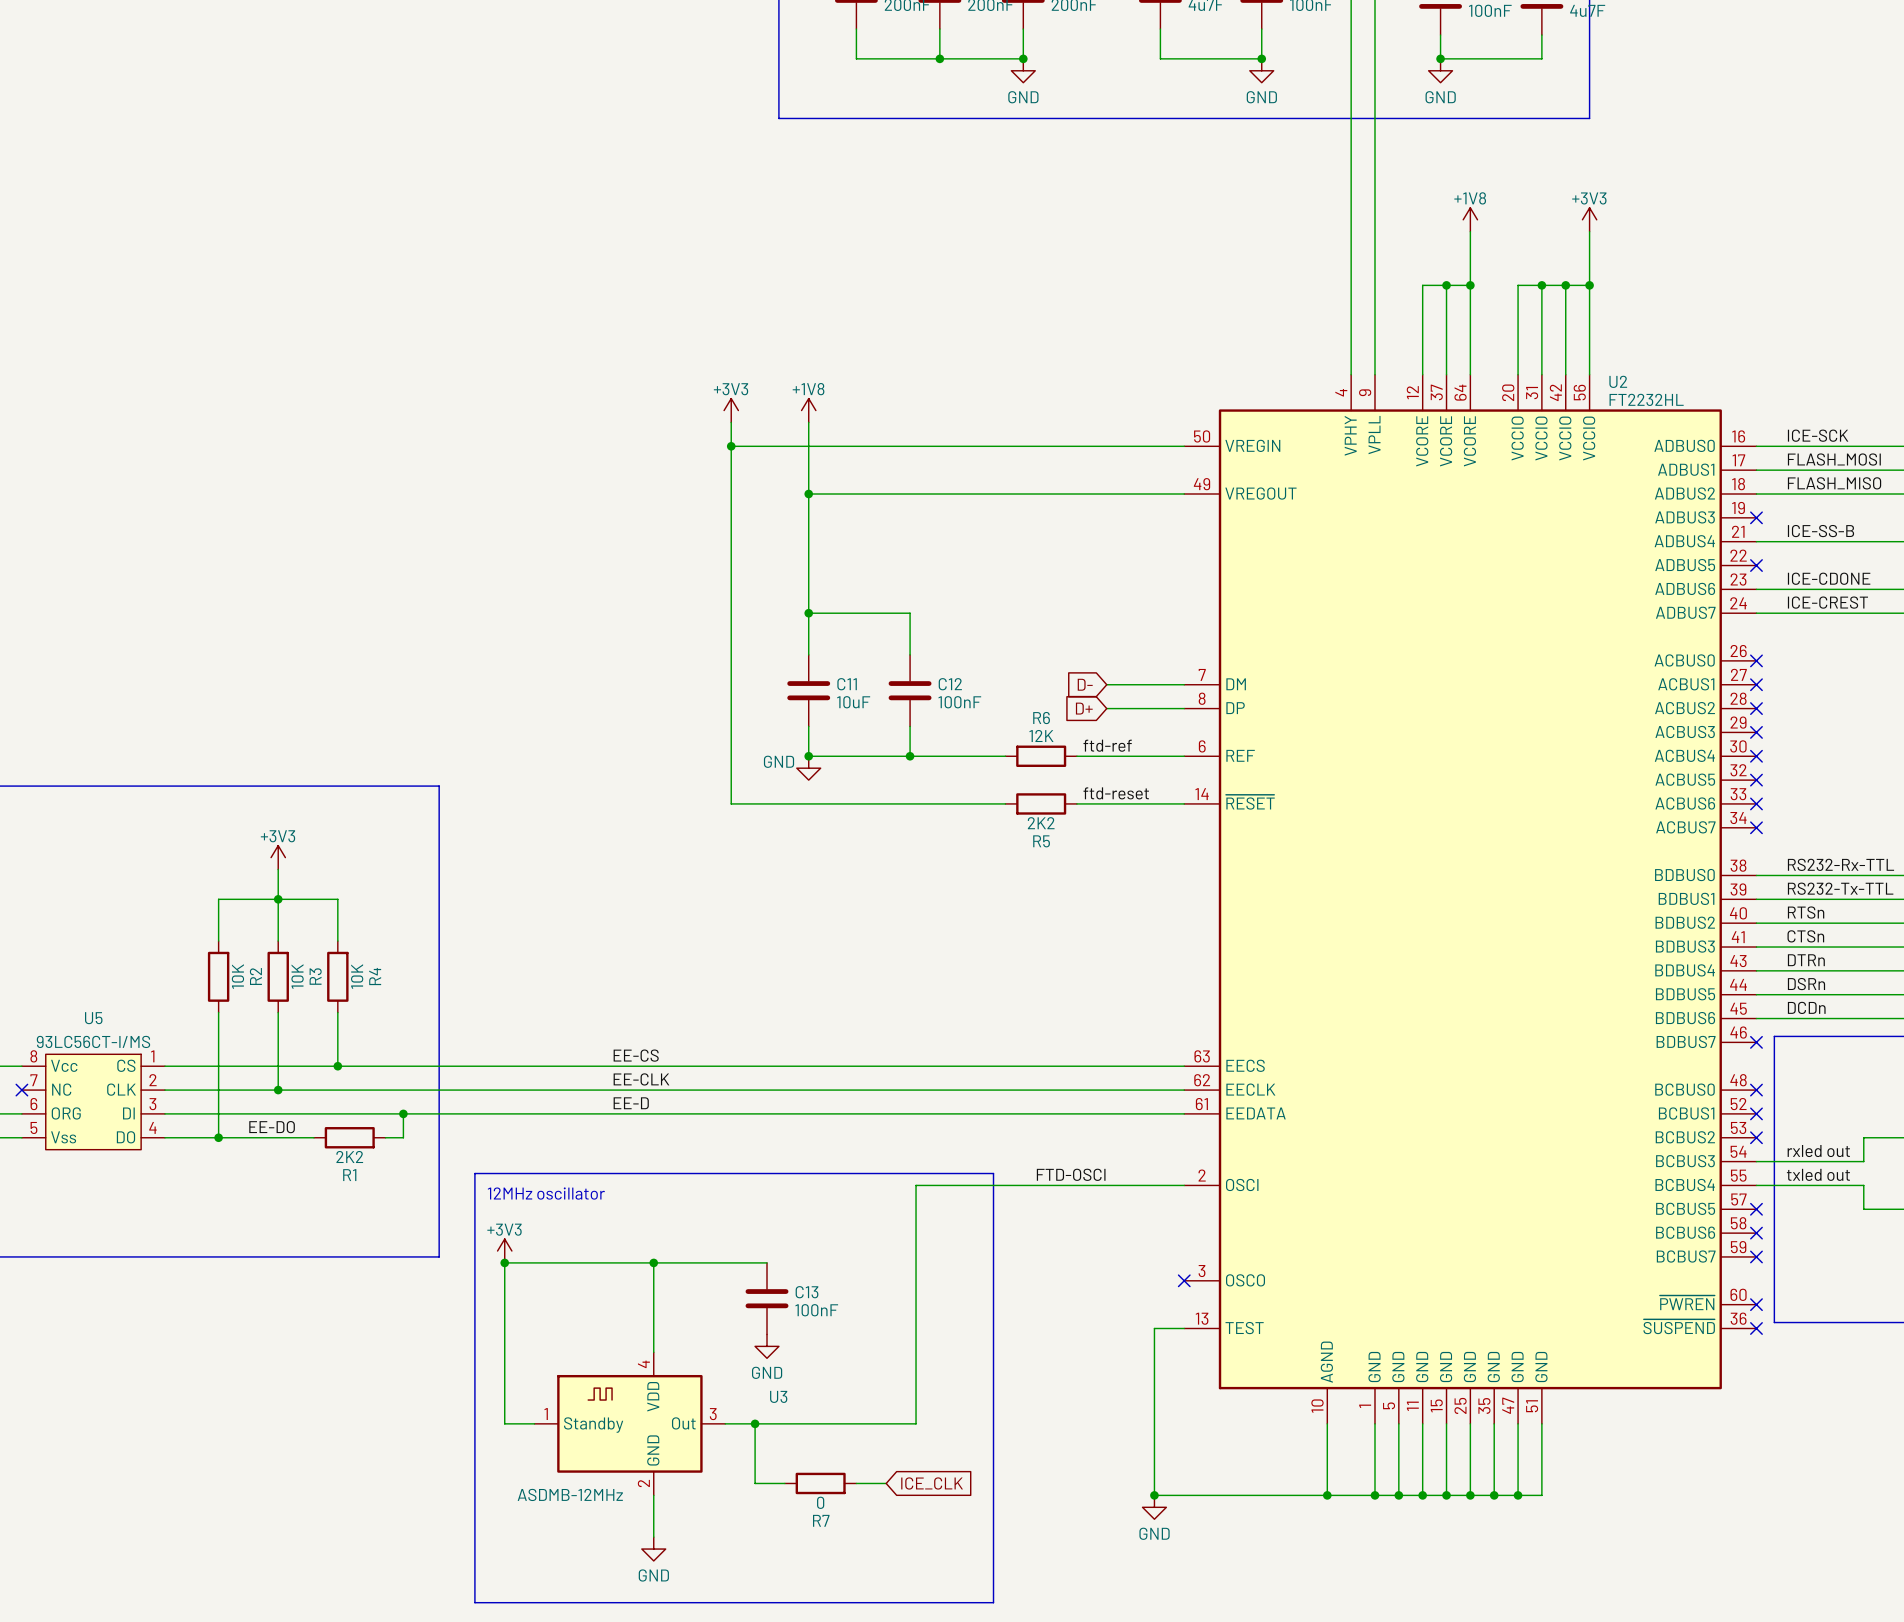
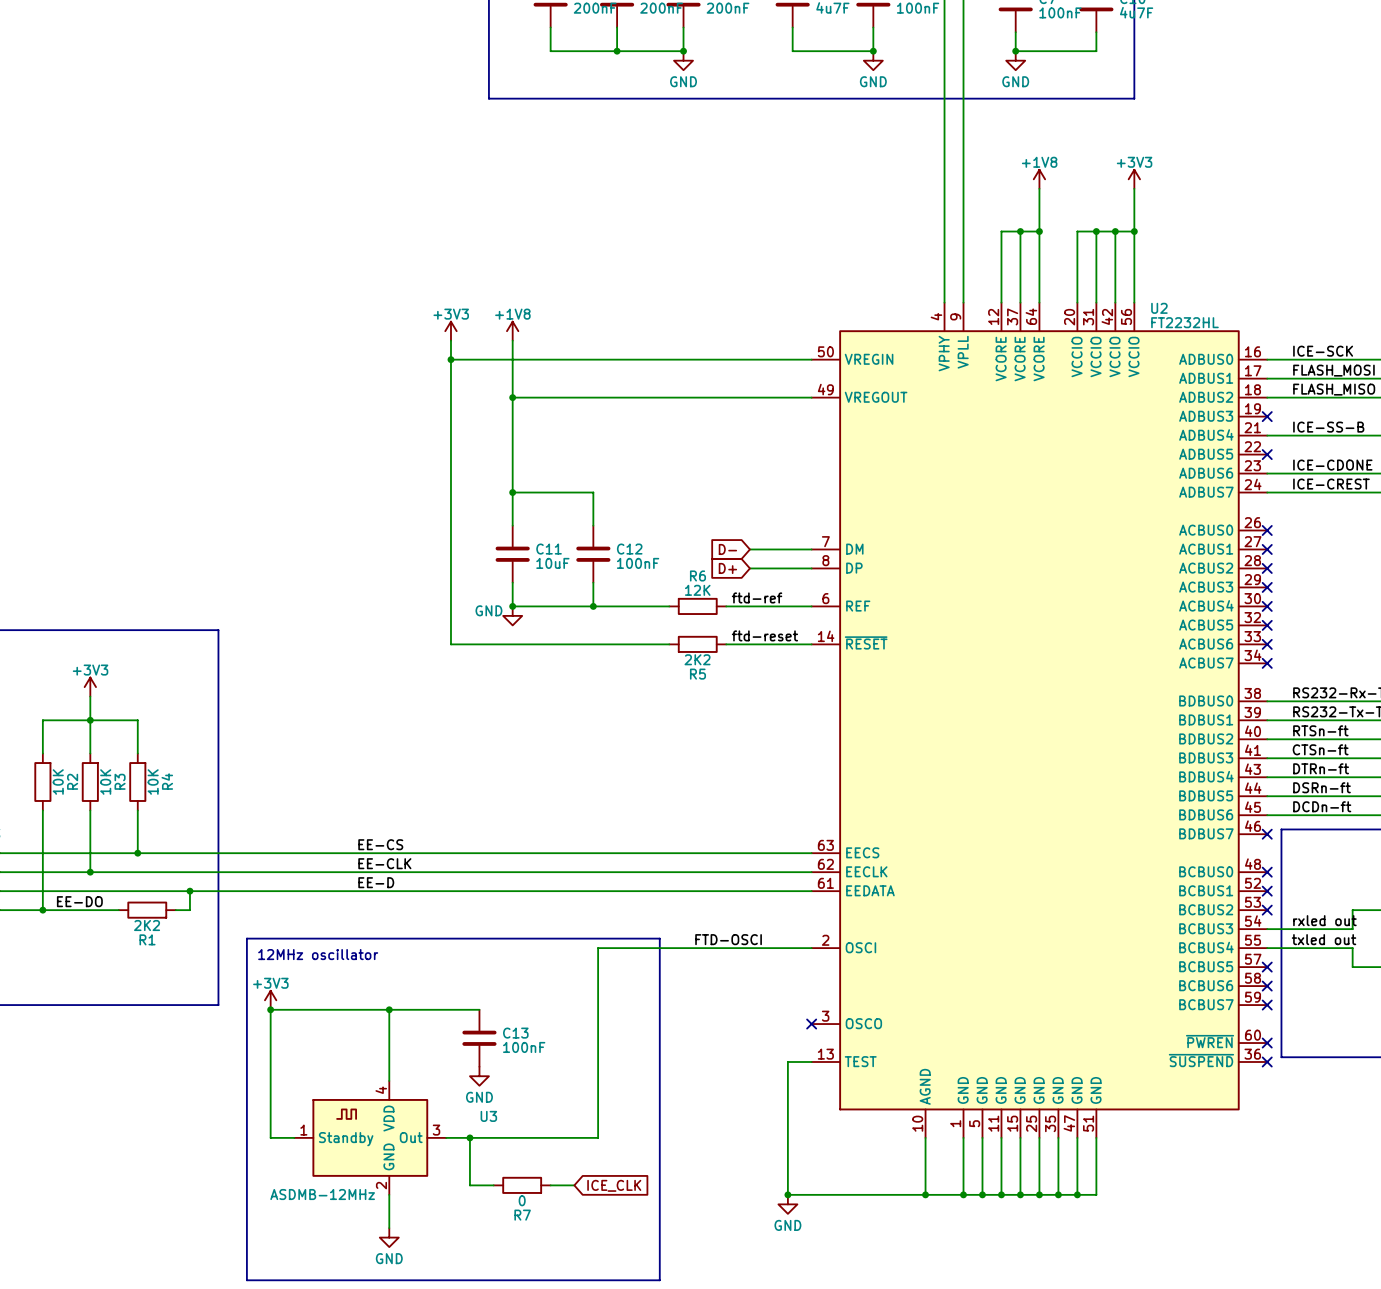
label: RTSn (1806, 912) -> RTSn-ft (1320, 730)
label: CTSn (1805, 936) -> CTSn-ft (1320, 749)
label: DTRn (1806, 960) -> DTRn-ft (1321, 768)
label: DSRn (1806, 984) -> DSRn-ft (1321, 787)
label: DCDn (1806, 1007) -> DCDn-ft (1322, 806)

